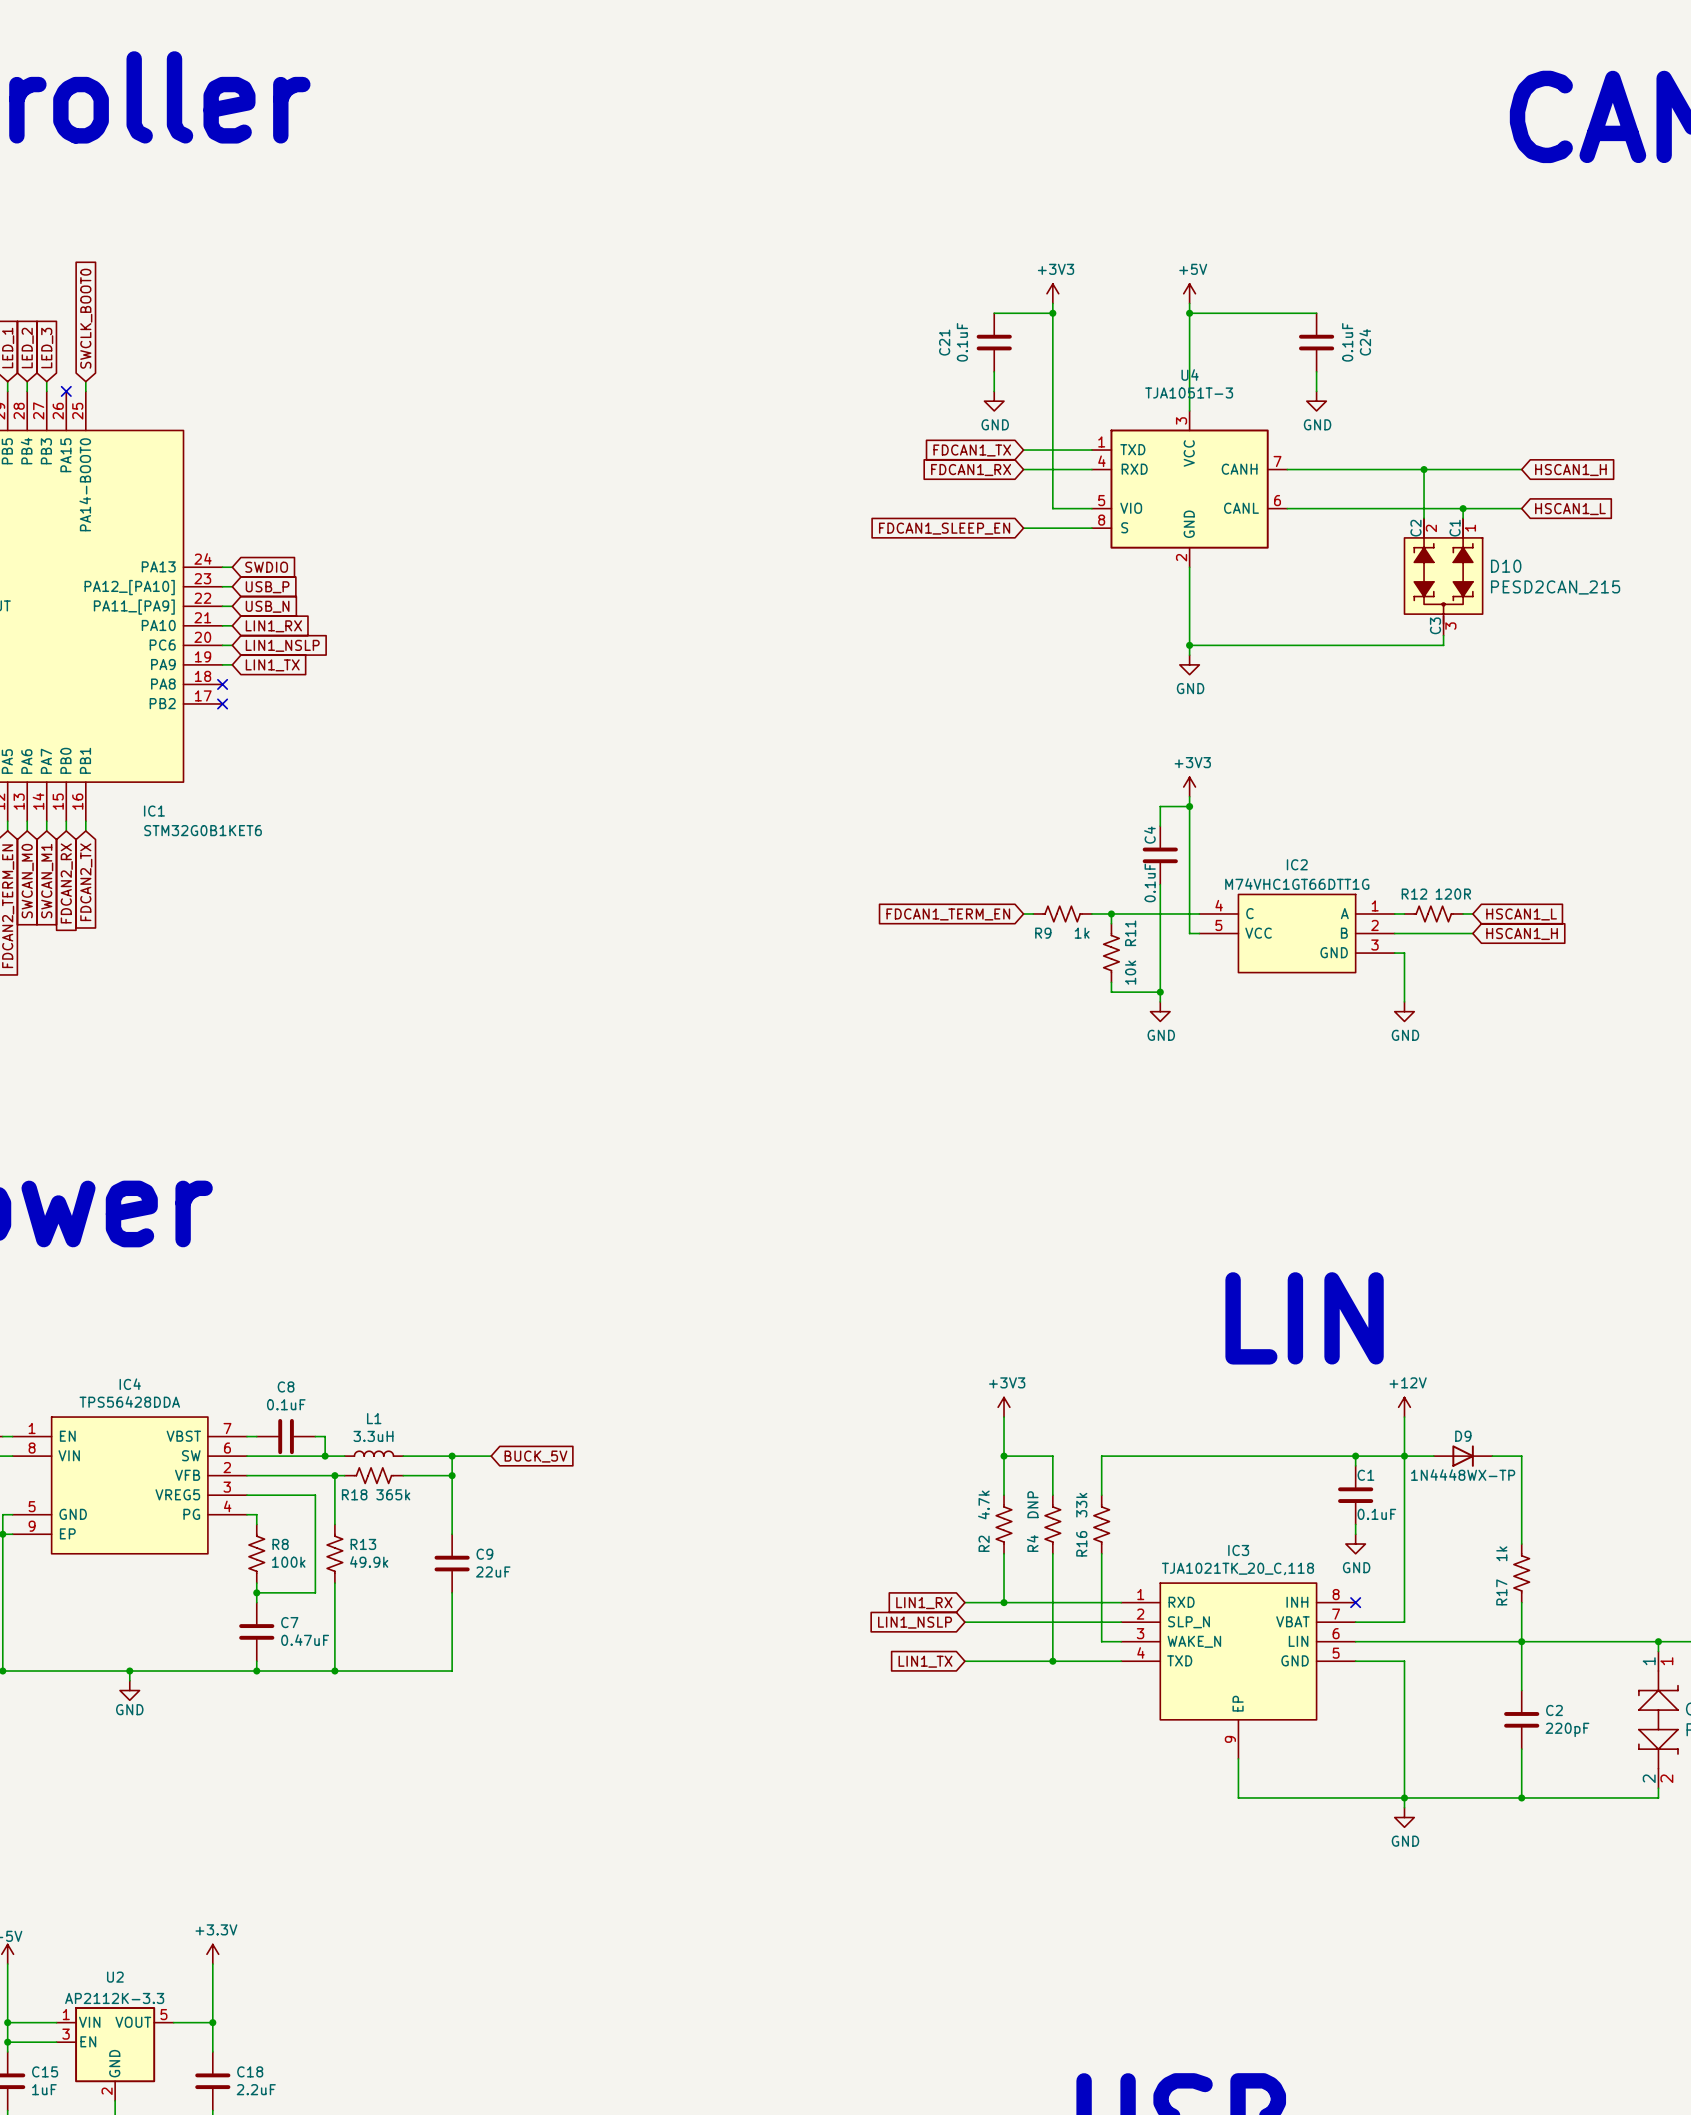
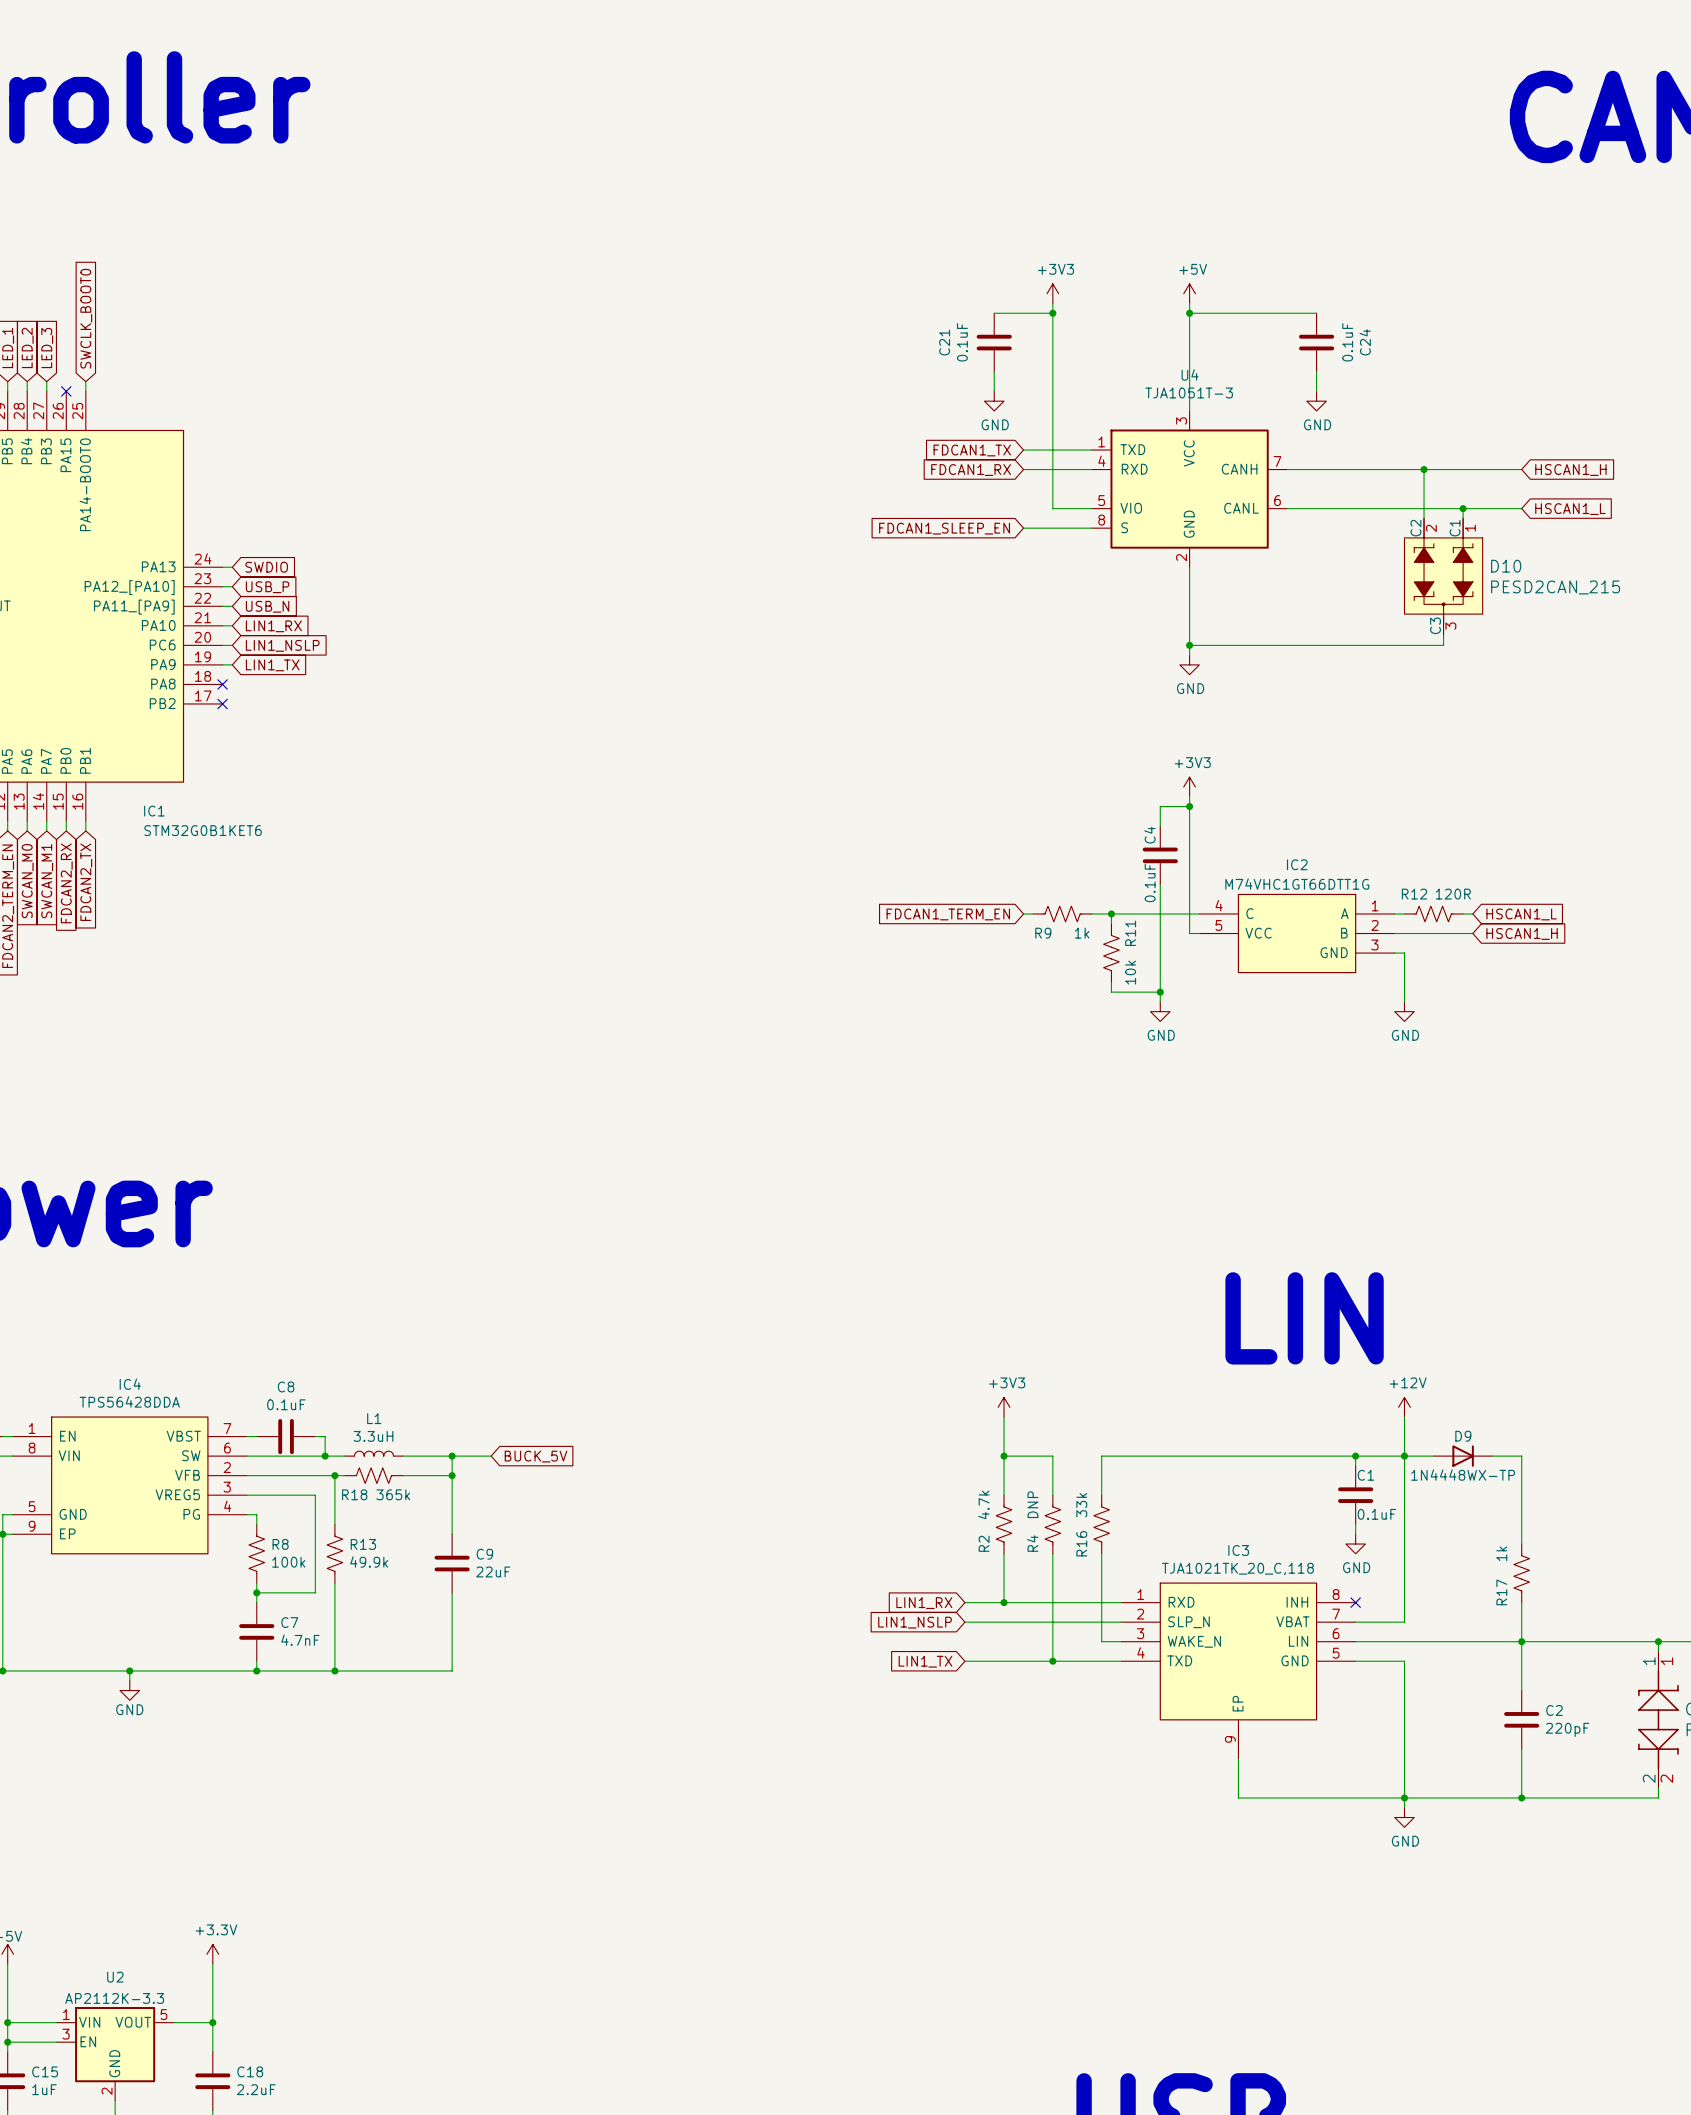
C7 value: 0.47uF (305, 1640) -> 4.7nF (300, 1640)

